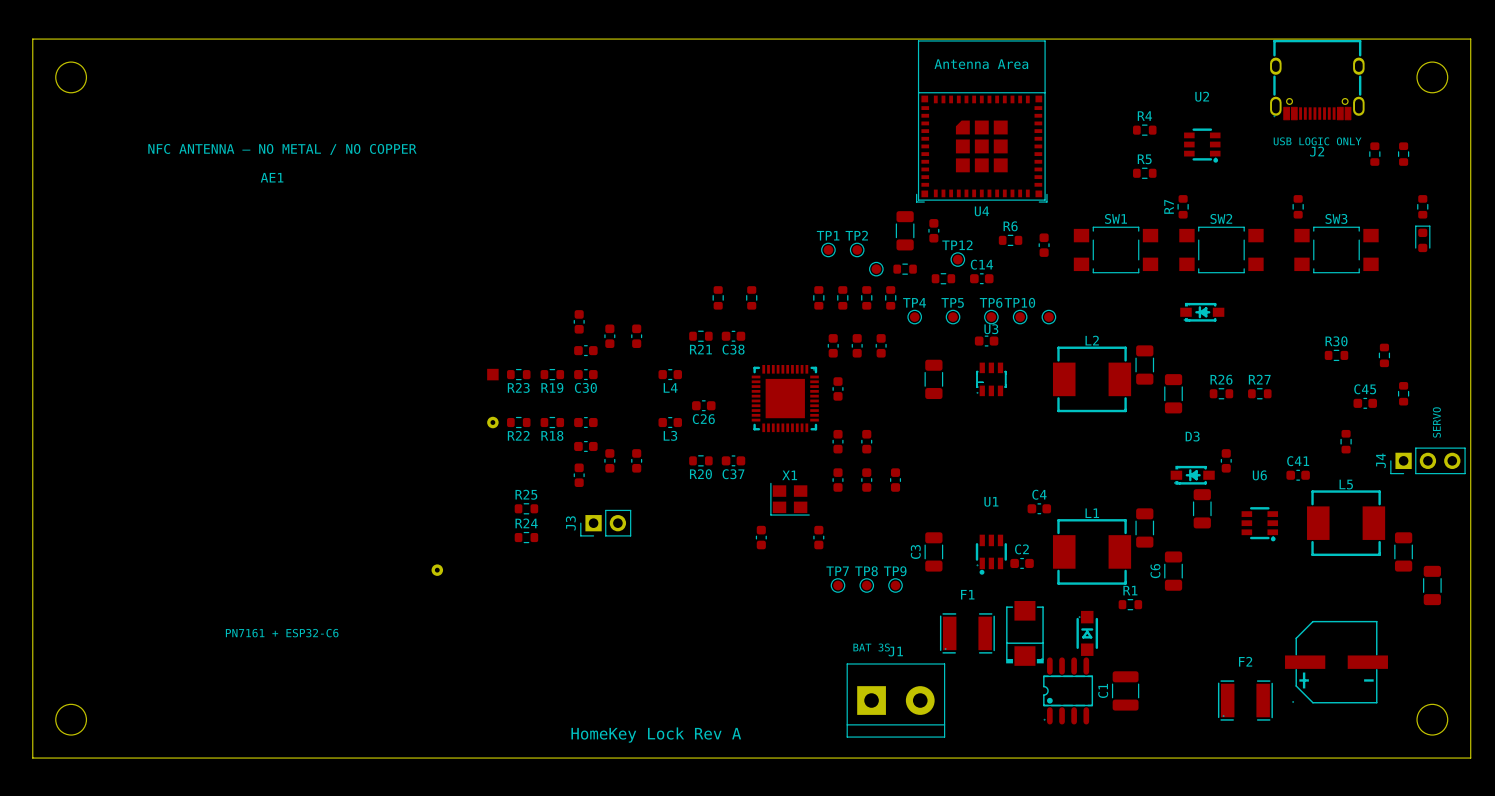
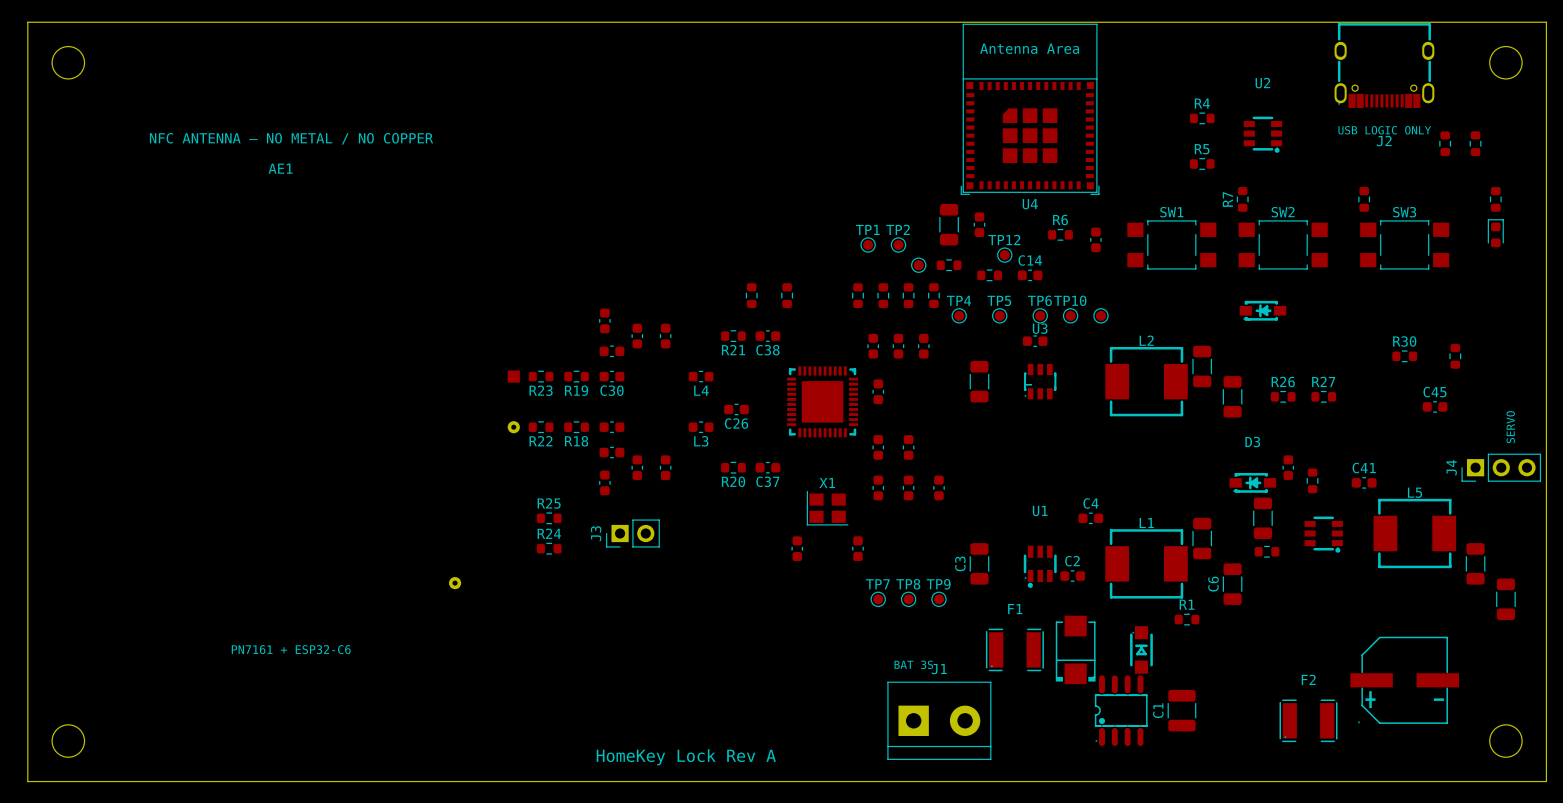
part: (1403, 393) -> none
part: (1346, 441) -> none
part: none -> (1312, 480)
U6 name: U6 (1259, 475) -> none
part: none -> (1267, 551)

